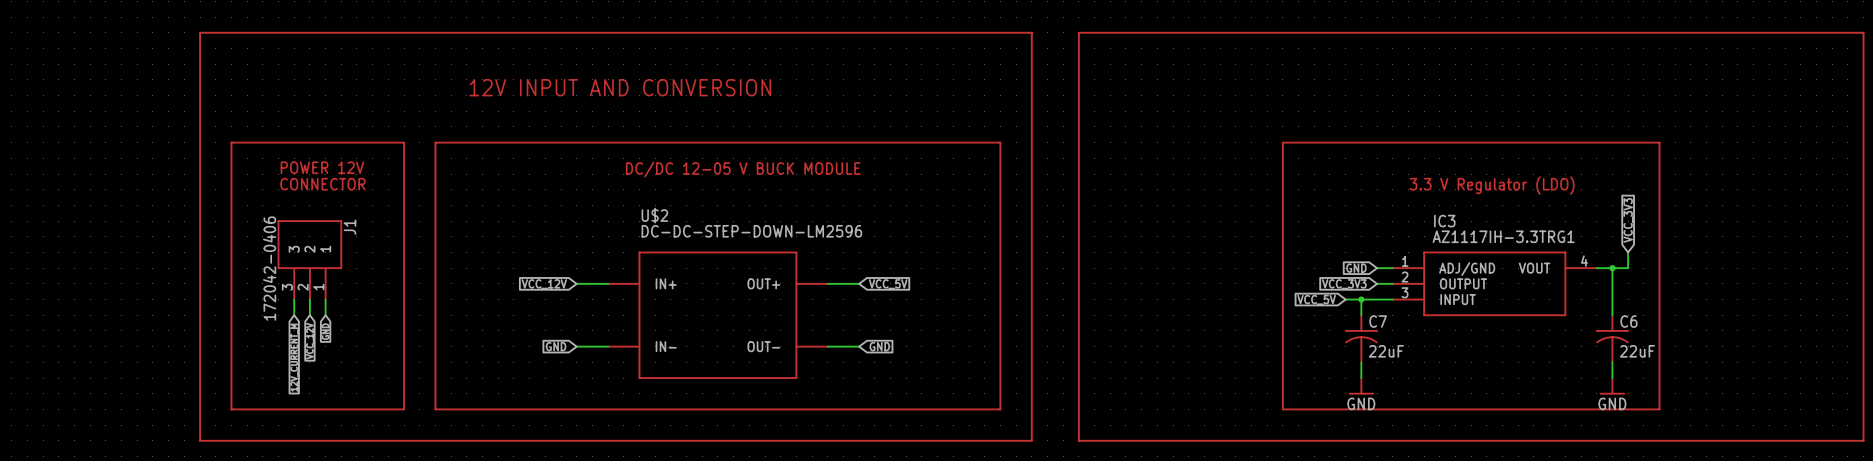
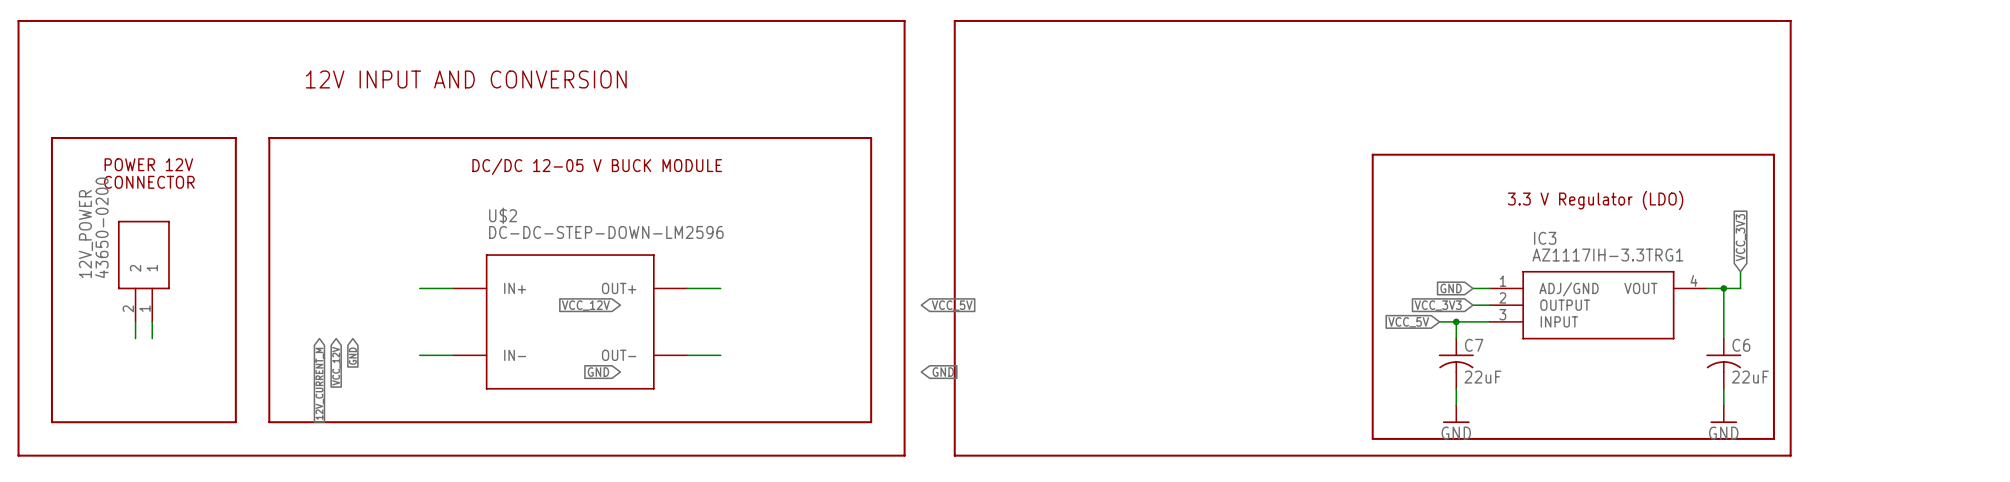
line: (200, 32) (200, 440) (1031, 440) (1031, 32) (200, 32) -> (18, 20) (18, 455) (904, 455) (904, 20) (18, 20)
line: (1078, 32) (1863, 32) (1863, 440) (1078, 440) (1078, 32) -> (954, 20) (1790, 20) (1790, 455) (954, 455) (954, 20)
text: none -> 12V INPUT AND CONVERSION (466, 79)
text: 12V INPUT AND CONVERSION (620, 87) -> none
line: none -> (51, 138) (235, 138) (235, 422) (51, 422) (51, 138)
line: none -> (269, 138) (269, 422) (871, 422) (871, 138) (269, 138)
line: (231, 142) (404, 142) (404, 409) (231, 409) (231, 142) -> none
line: (435, 142) (435, 409) (1000, 409) (1000, 142) (435, 142) -> none
text: none -> POWER 12V (148, 164)
text: none -> DC/DC 12-05 V BUCK MODULE (597, 166)
text: POWER 12V (322, 167) -> none
text: none -> CONNECTOR (149, 182)
text: DC/DC 12-05 V BUCK MODULE (743, 169) -> none
text: CONNECTOR (322, 184) -> none
12V_POWER: none -> 43650-0200 (143, 271)
J1: 172042-0406 (309, 259) -> none
wire: none -> (419, 288) (453, 288)
wire: (576, 283) (608, 283) -> (687, 288) (720, 288)
wire: (827, 283) (859, 283) -> none
wire: none -> (135, 321) (135, 338)
wire: none -> (152, 321) (152, 338)
wire: (294, 299) (294, 315) -> none
wire: (309, 299) (309, 315) -> none
wire: (325, 299) (325, 315) -> none
U$2 position: (717, 315) -> (570, 321)
wire: none -> (419, 355) (453, 355)
wire: (576, 346) (608, 346) -> (687, 355) (720, 355)
wire: (827, 346) (859, 346) -> none

